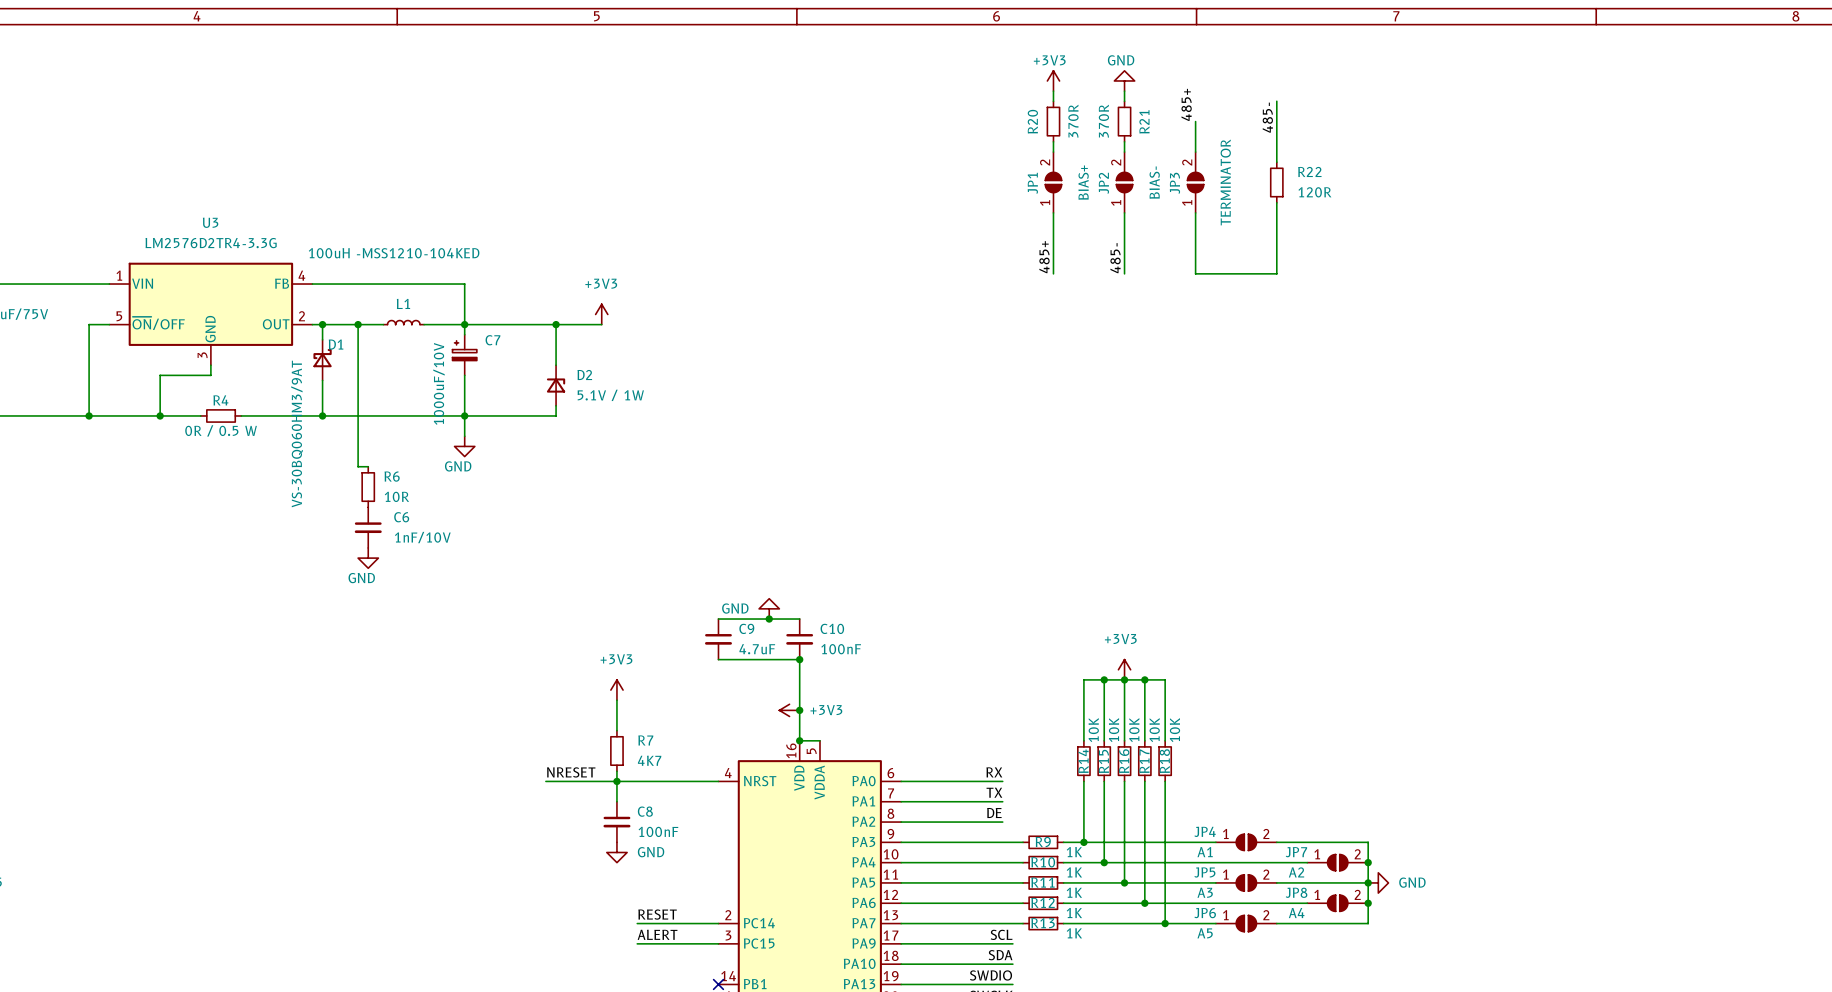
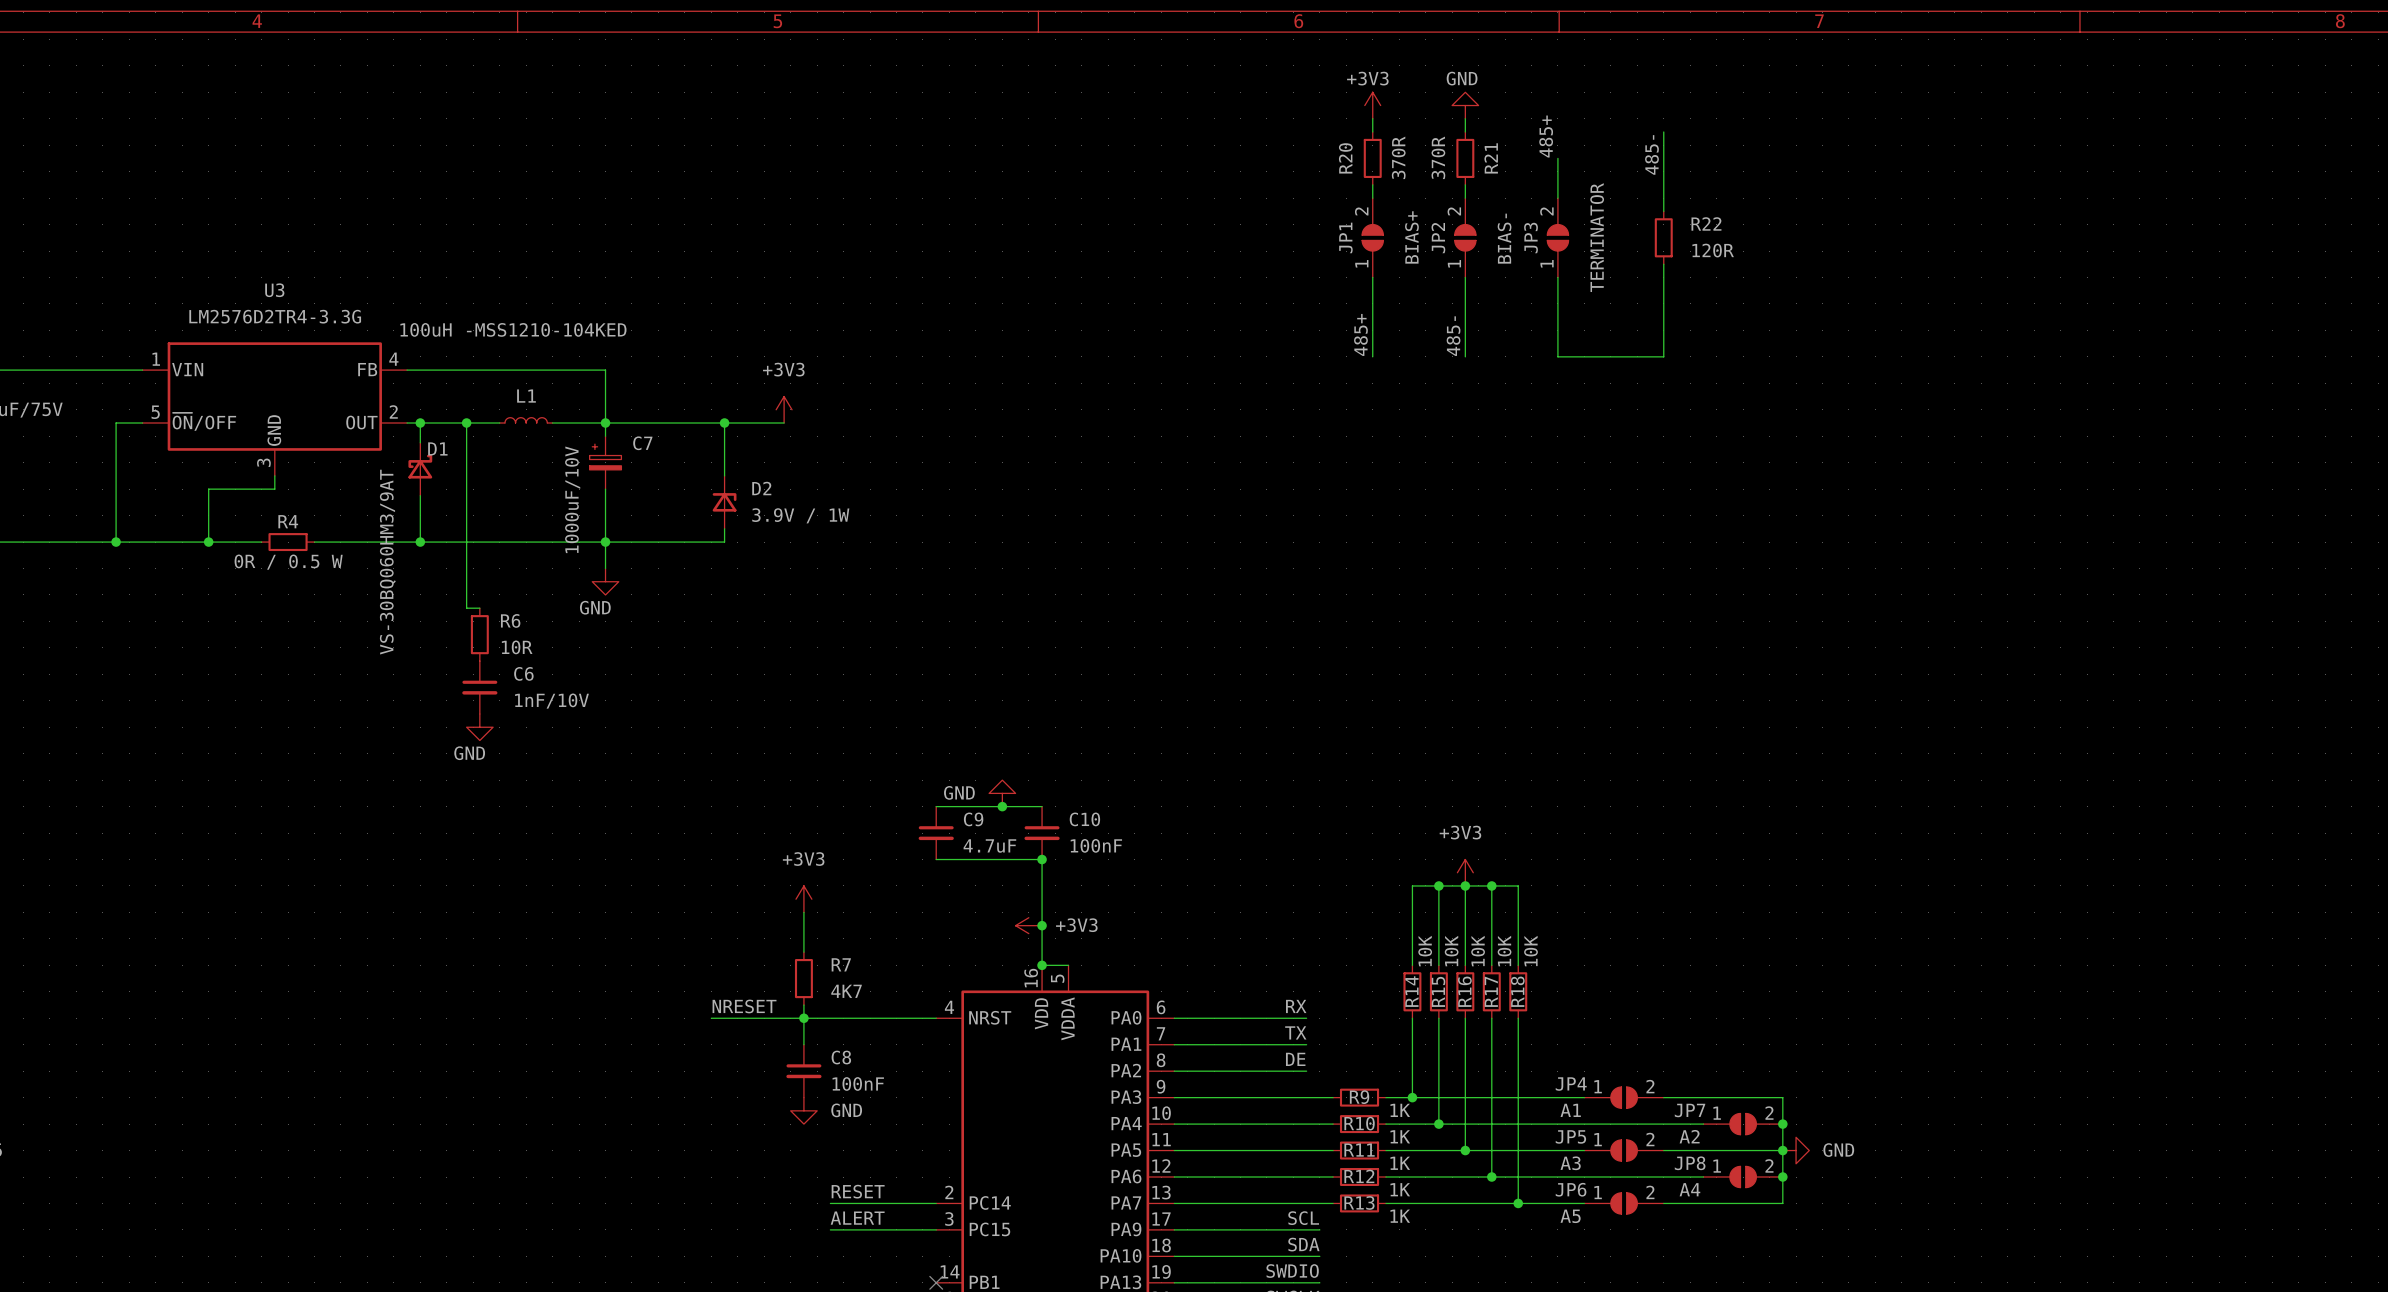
D2 value: 5.1V / 1W (610, 395) -> 3.9V / 1W (800, 515)

